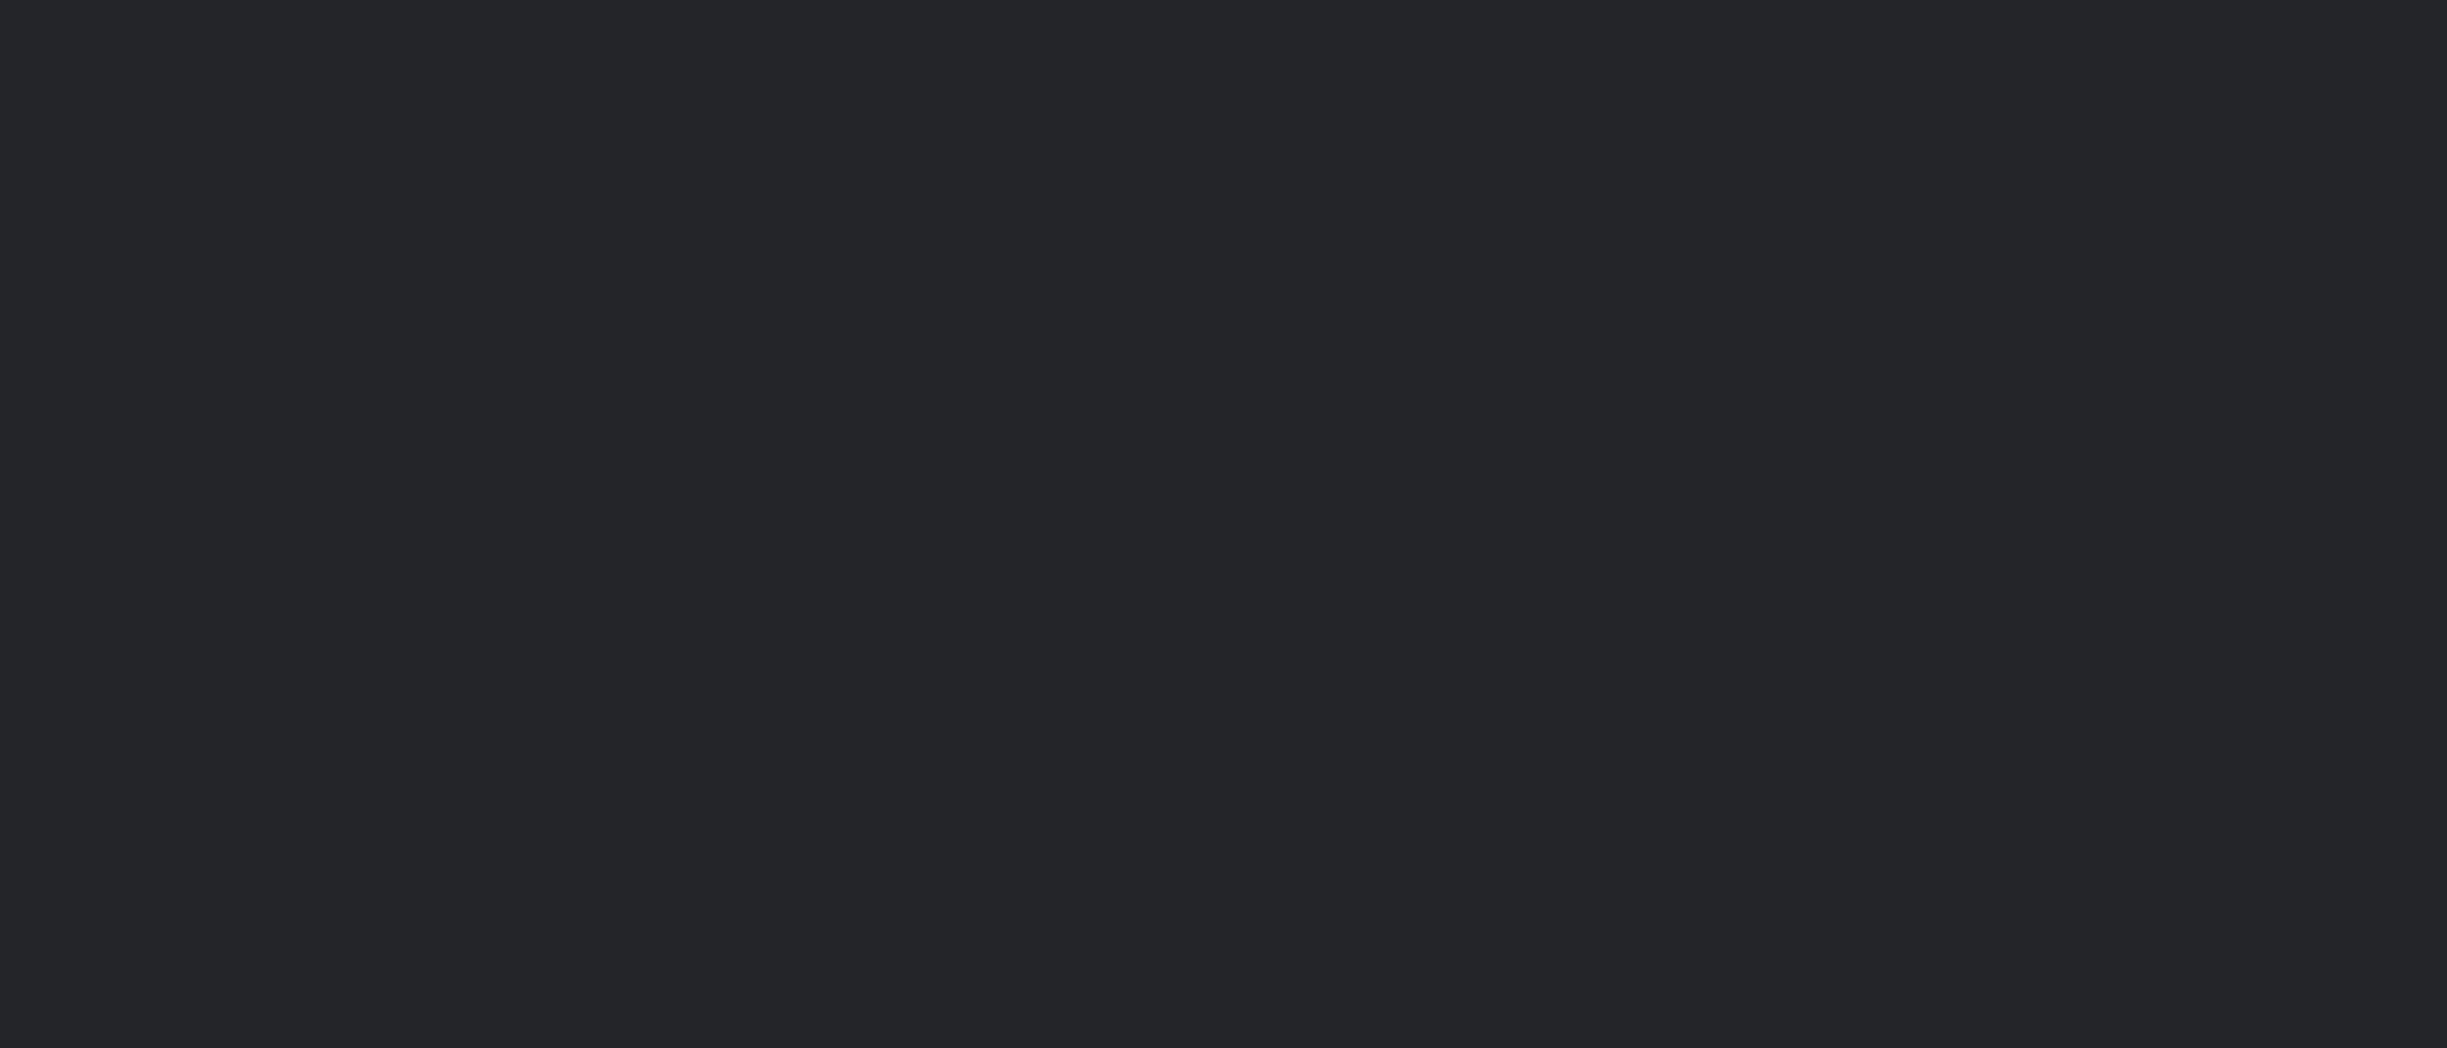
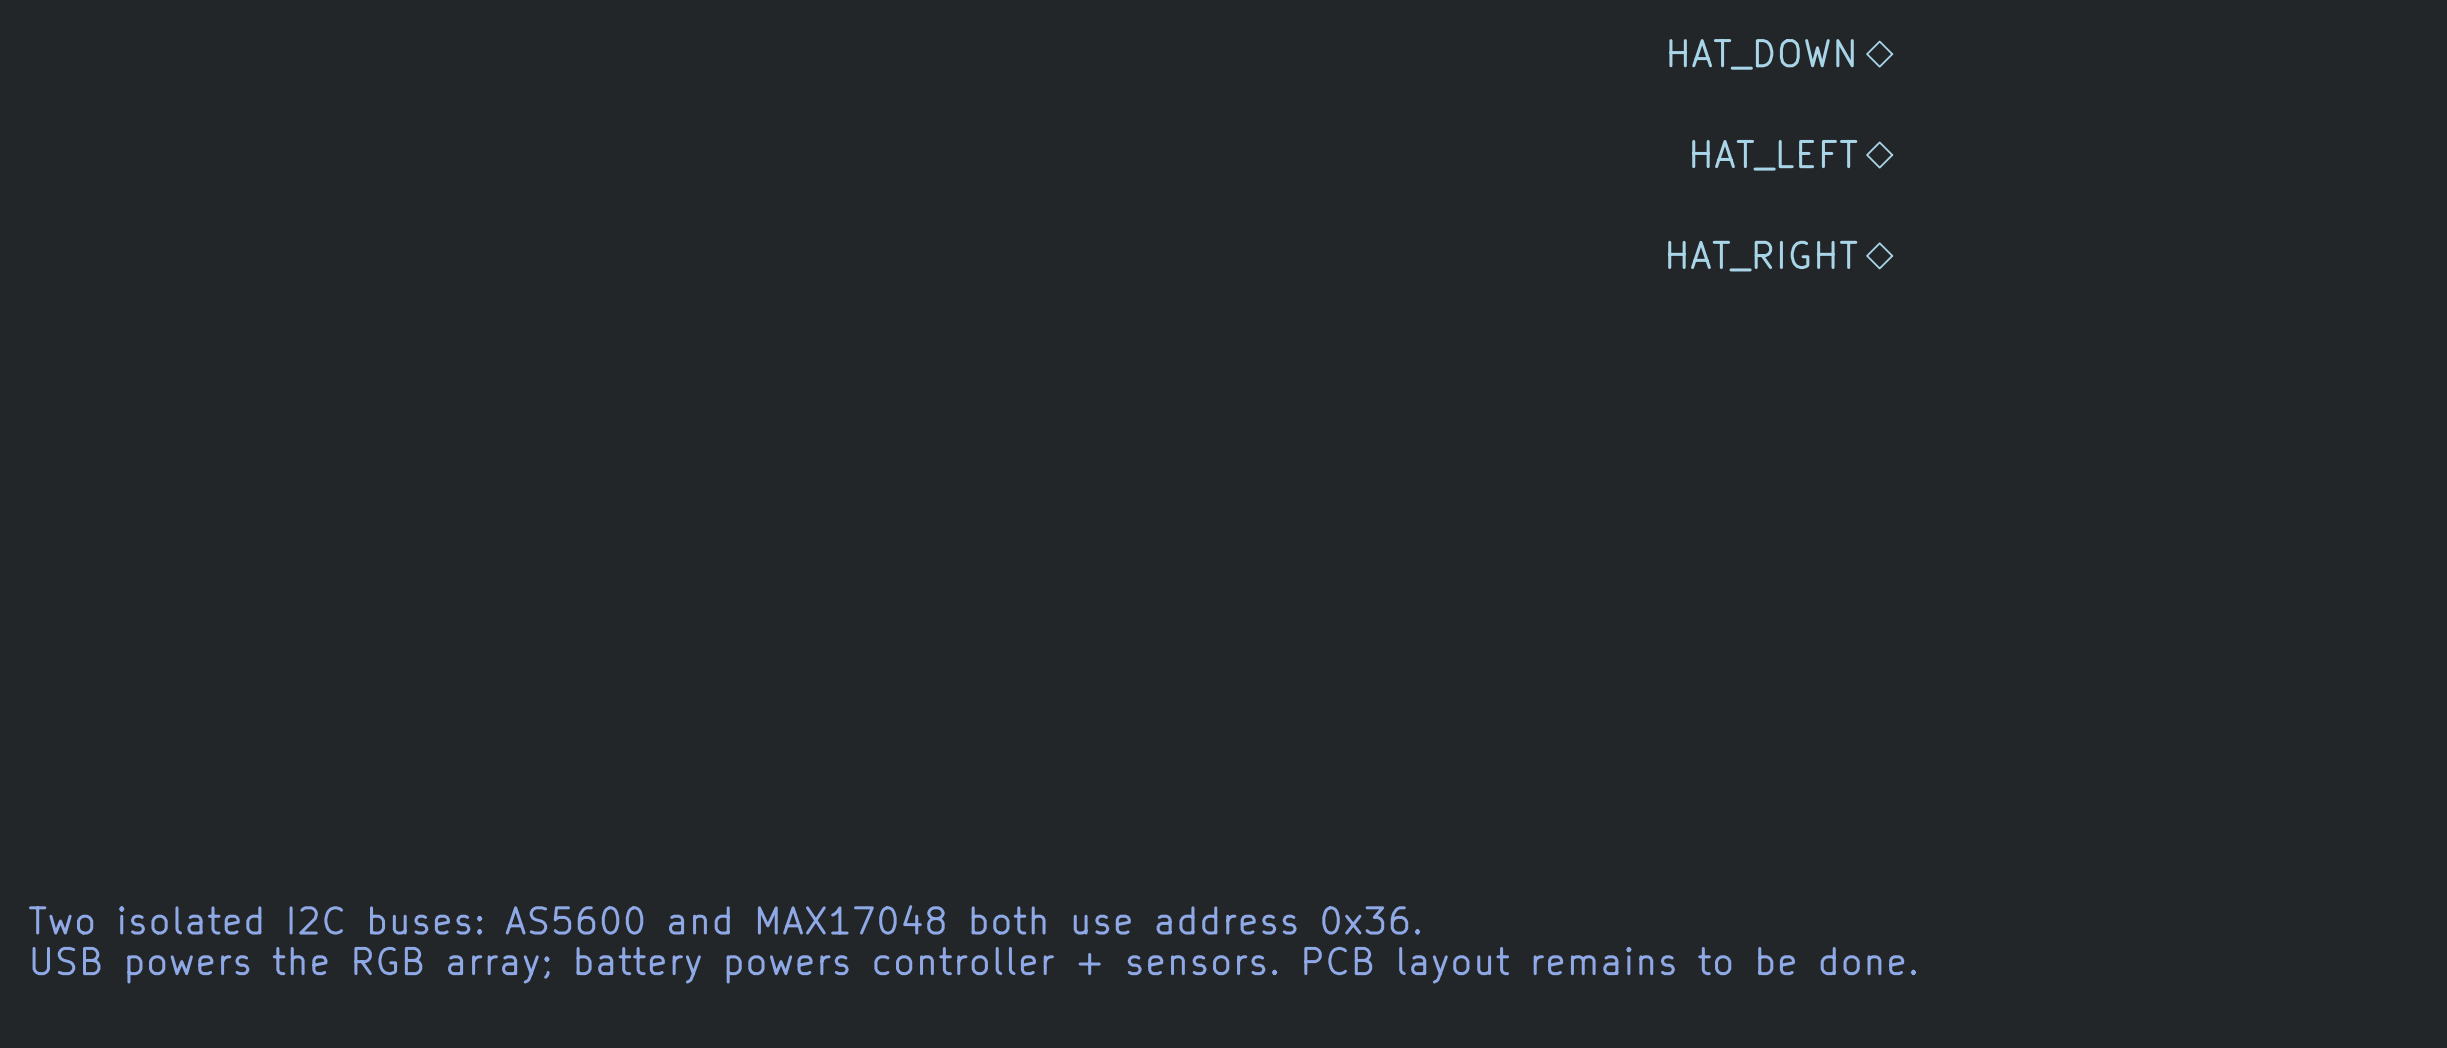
sheet pin: none -> HAT_DOWN (1761, 54)
sheet pin: none -> HAT_LEFT (1774, 155)
sheet pin: none -> HAT_RIGHT (1762, 256)
text: none -> Two isolated I2C buses: AS5600 and MAX17048 both use address 0x36. (724, 919)
text: none -> USB powers the RGB array; battery powers controller + sensors. PCB layout remains to be done. (974, 965)

